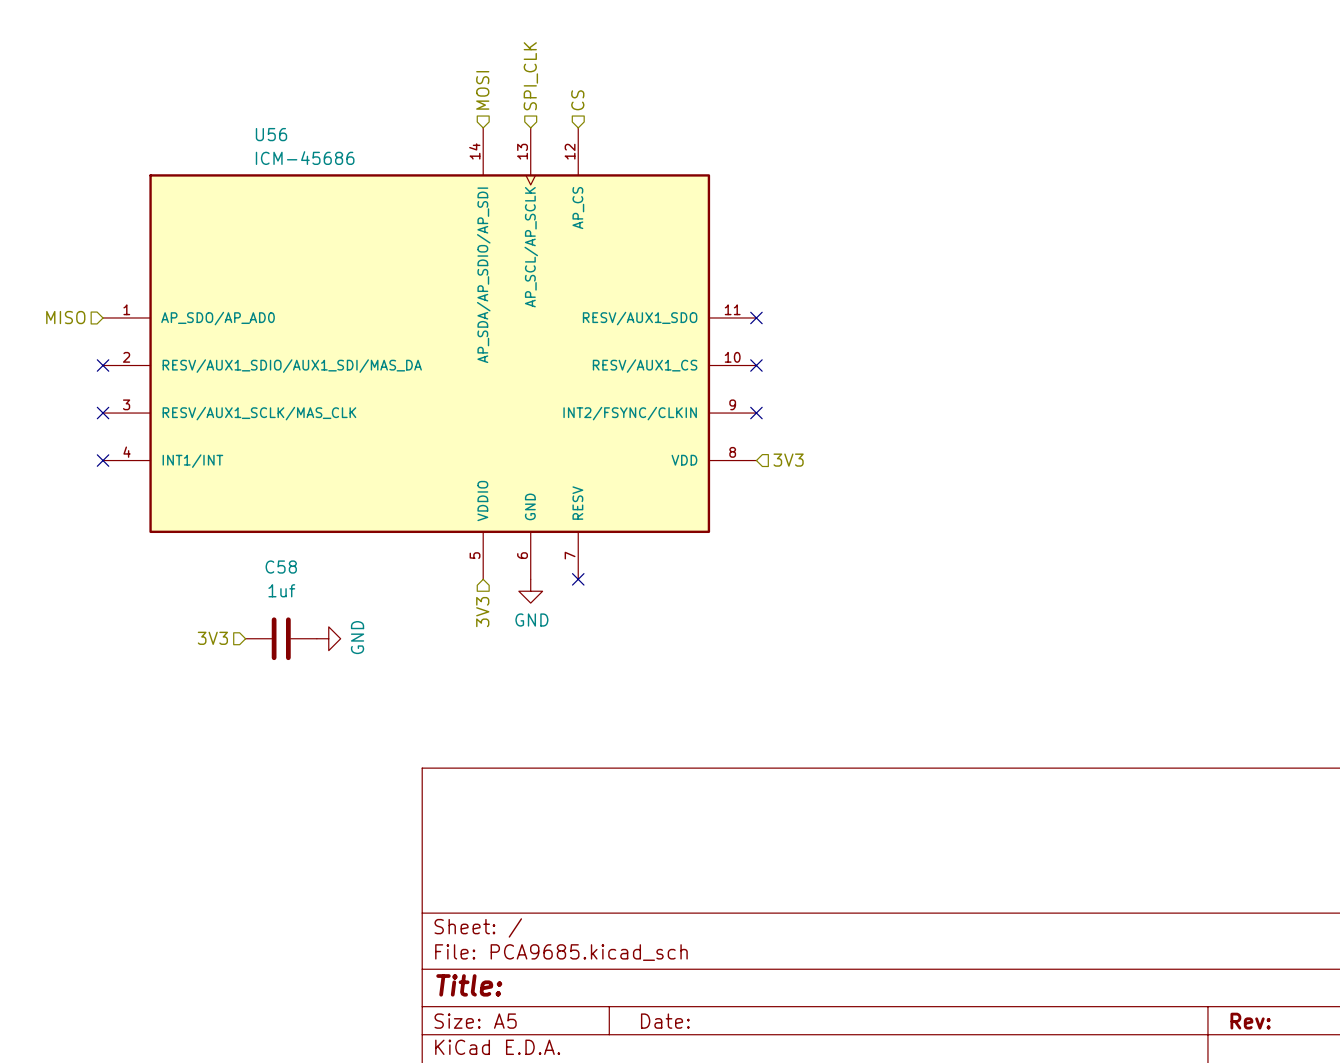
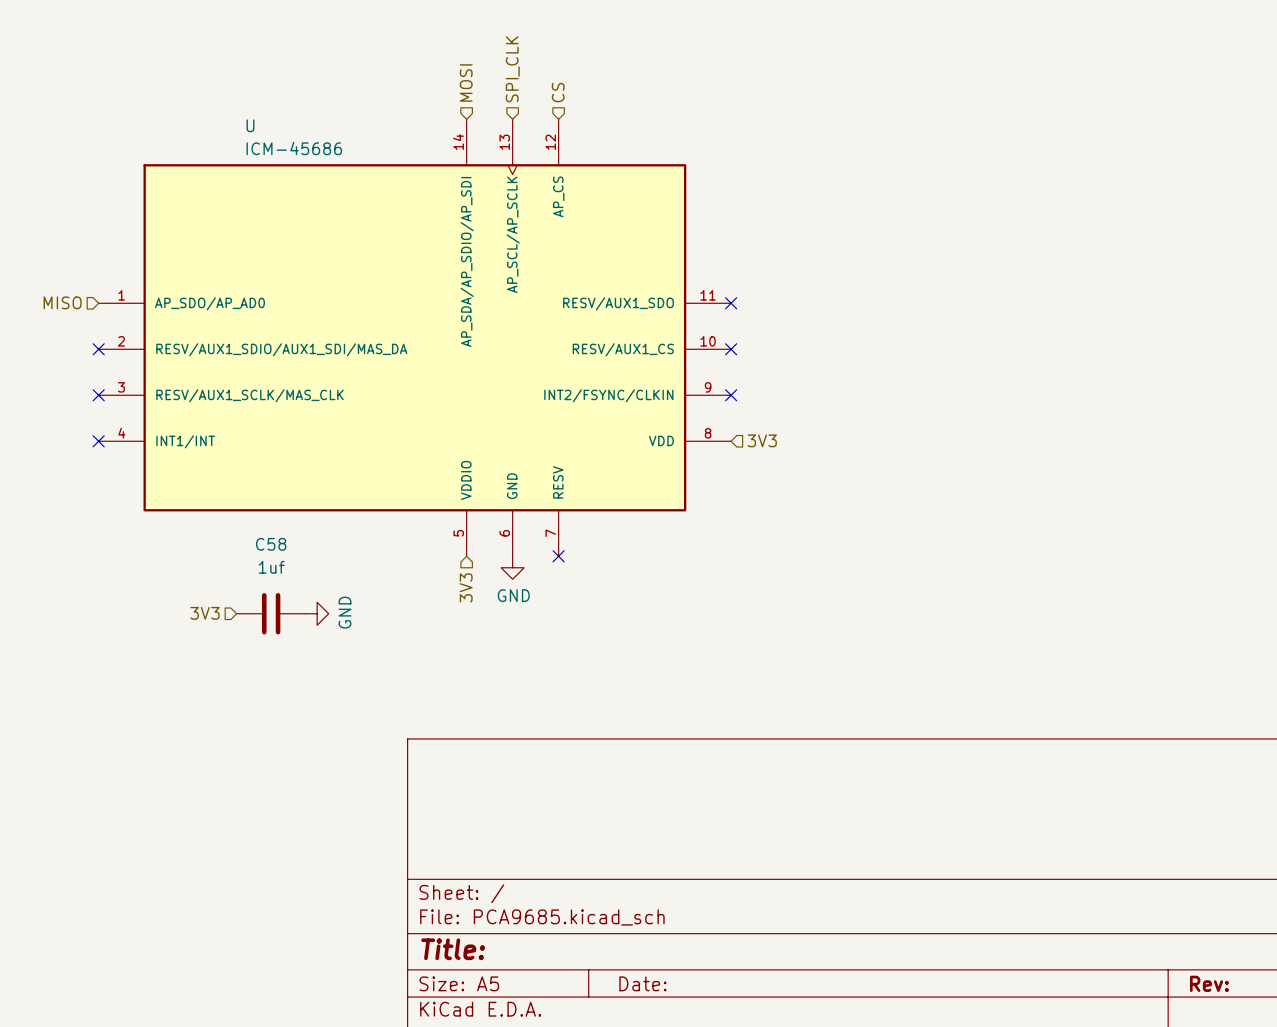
U56 name: U56 (271, 134) -> U (250, 125)

